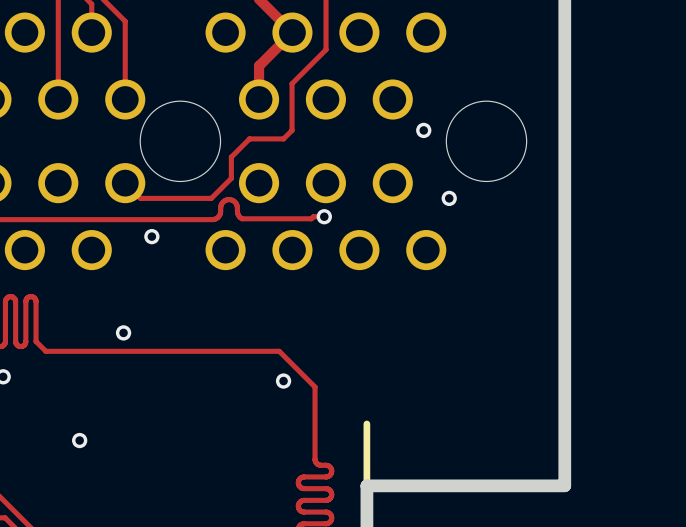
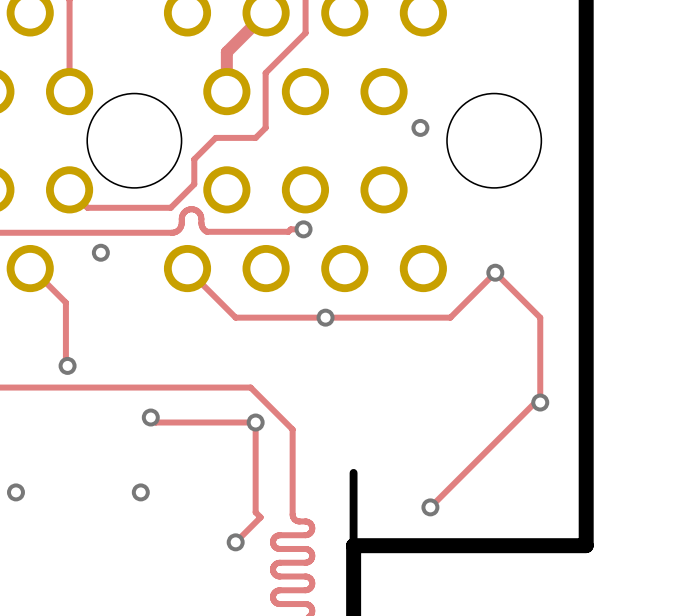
via position: (449, 198) -> (495, 272)
track: none -> (30, 268) (65, 302) (65, 362)
track: none -> (187, 268) (235, 317) (450, 317) (495, 272) (540, 317) (540, 402) (535, 402) (430, 507)
via: none -> (325, 317)
via: none -> (540, 402)
track: none -> (150, 417) (155, 422) (255, 422) (255, 512) (260, 517) (235, 542)
via: none -> (150, 417)
via: none -> (140, 492)
via: none -> (430, 507)
via: none -> (235, 542)

